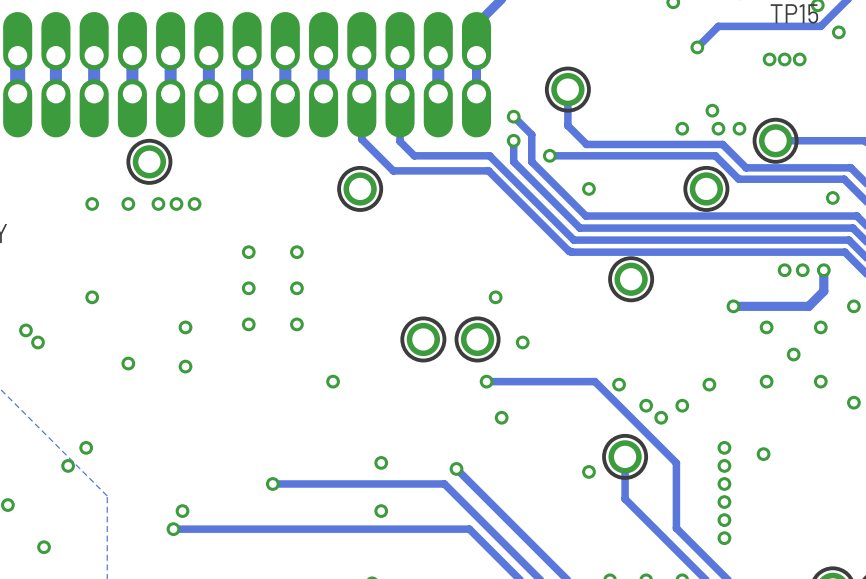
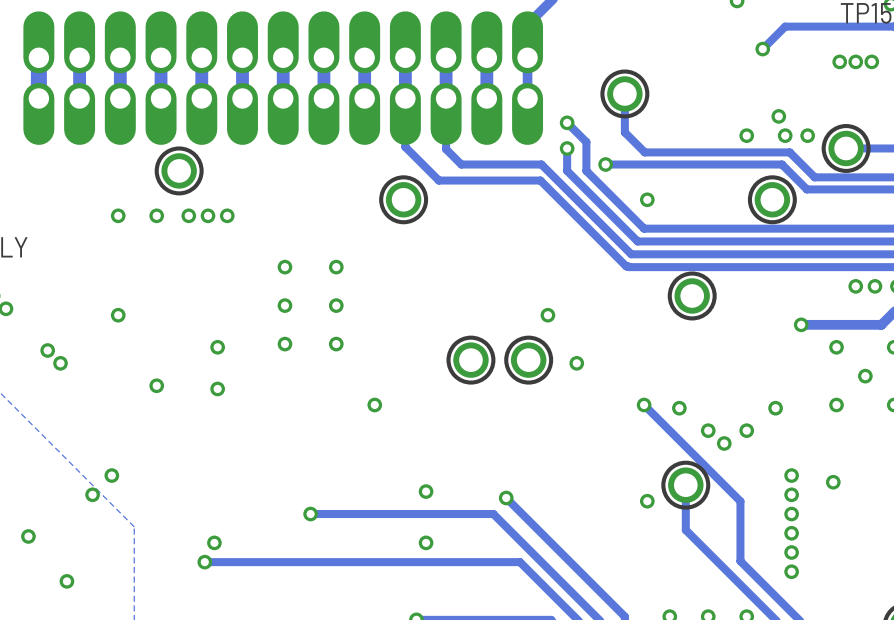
track: (486, 381) (594, 381) (676, 463) (676, 472) -> (644, 405) (740, 501)
via: (486, 381) -> none
via: none -> (644, 405)
via: (501, 417) -> none

